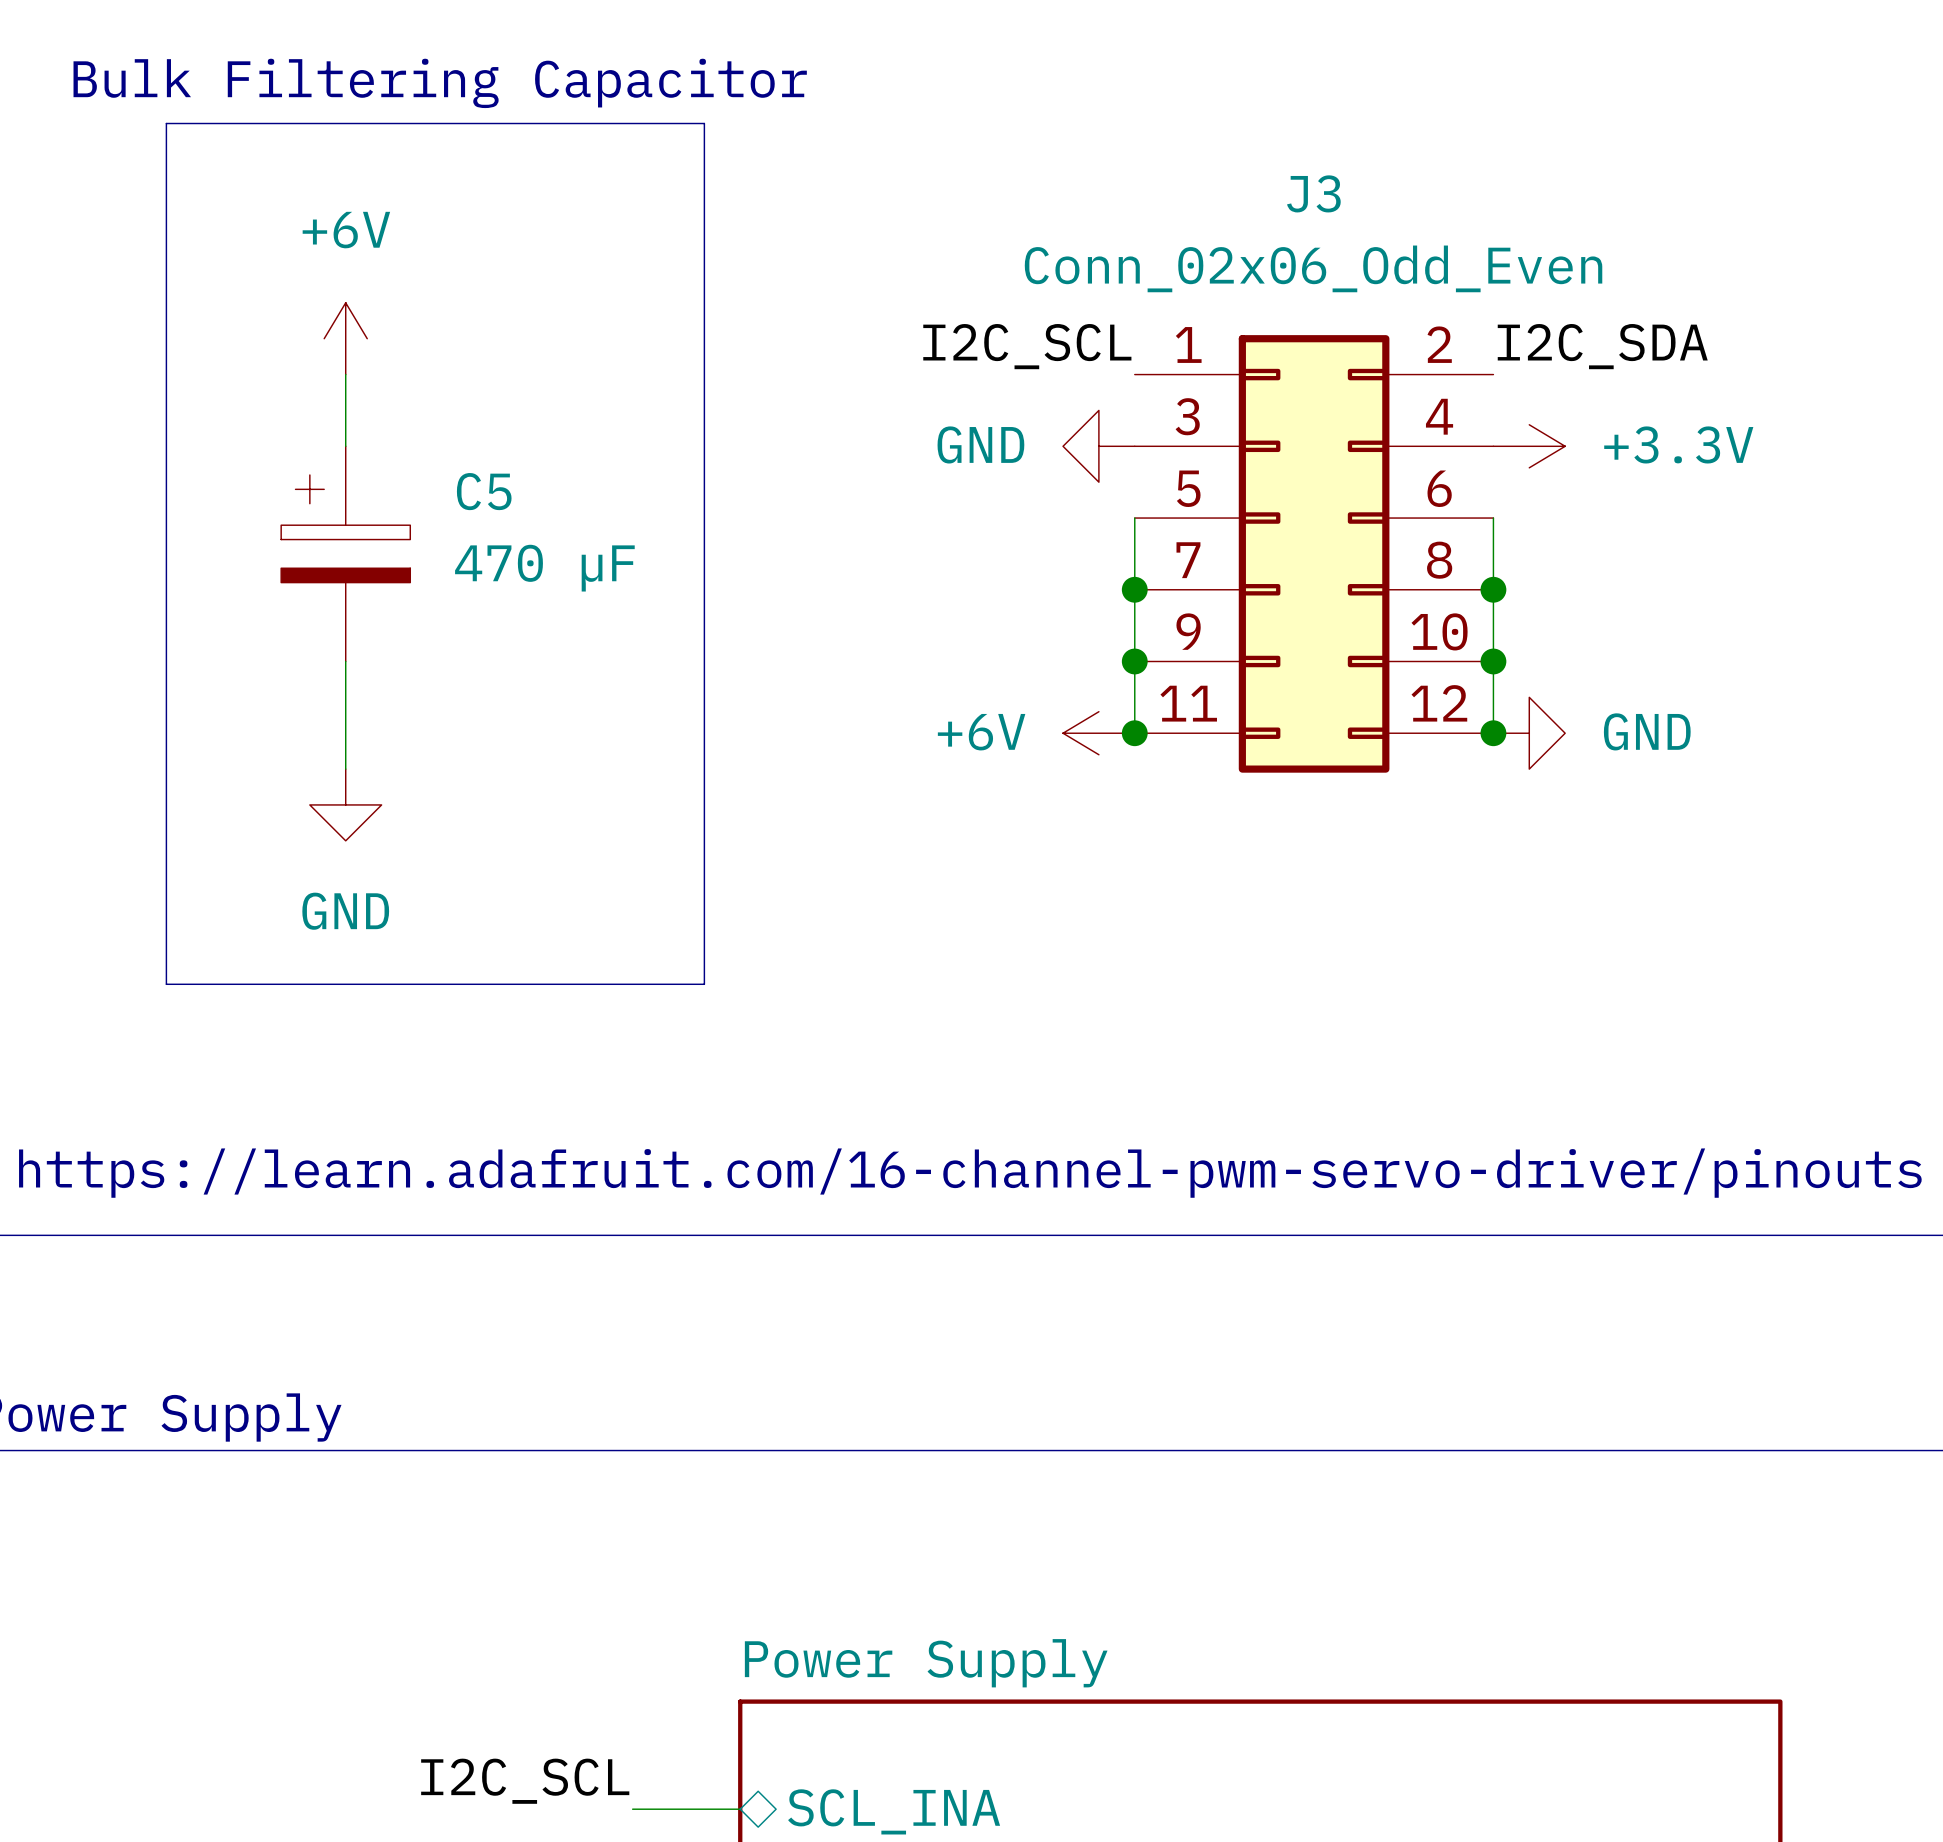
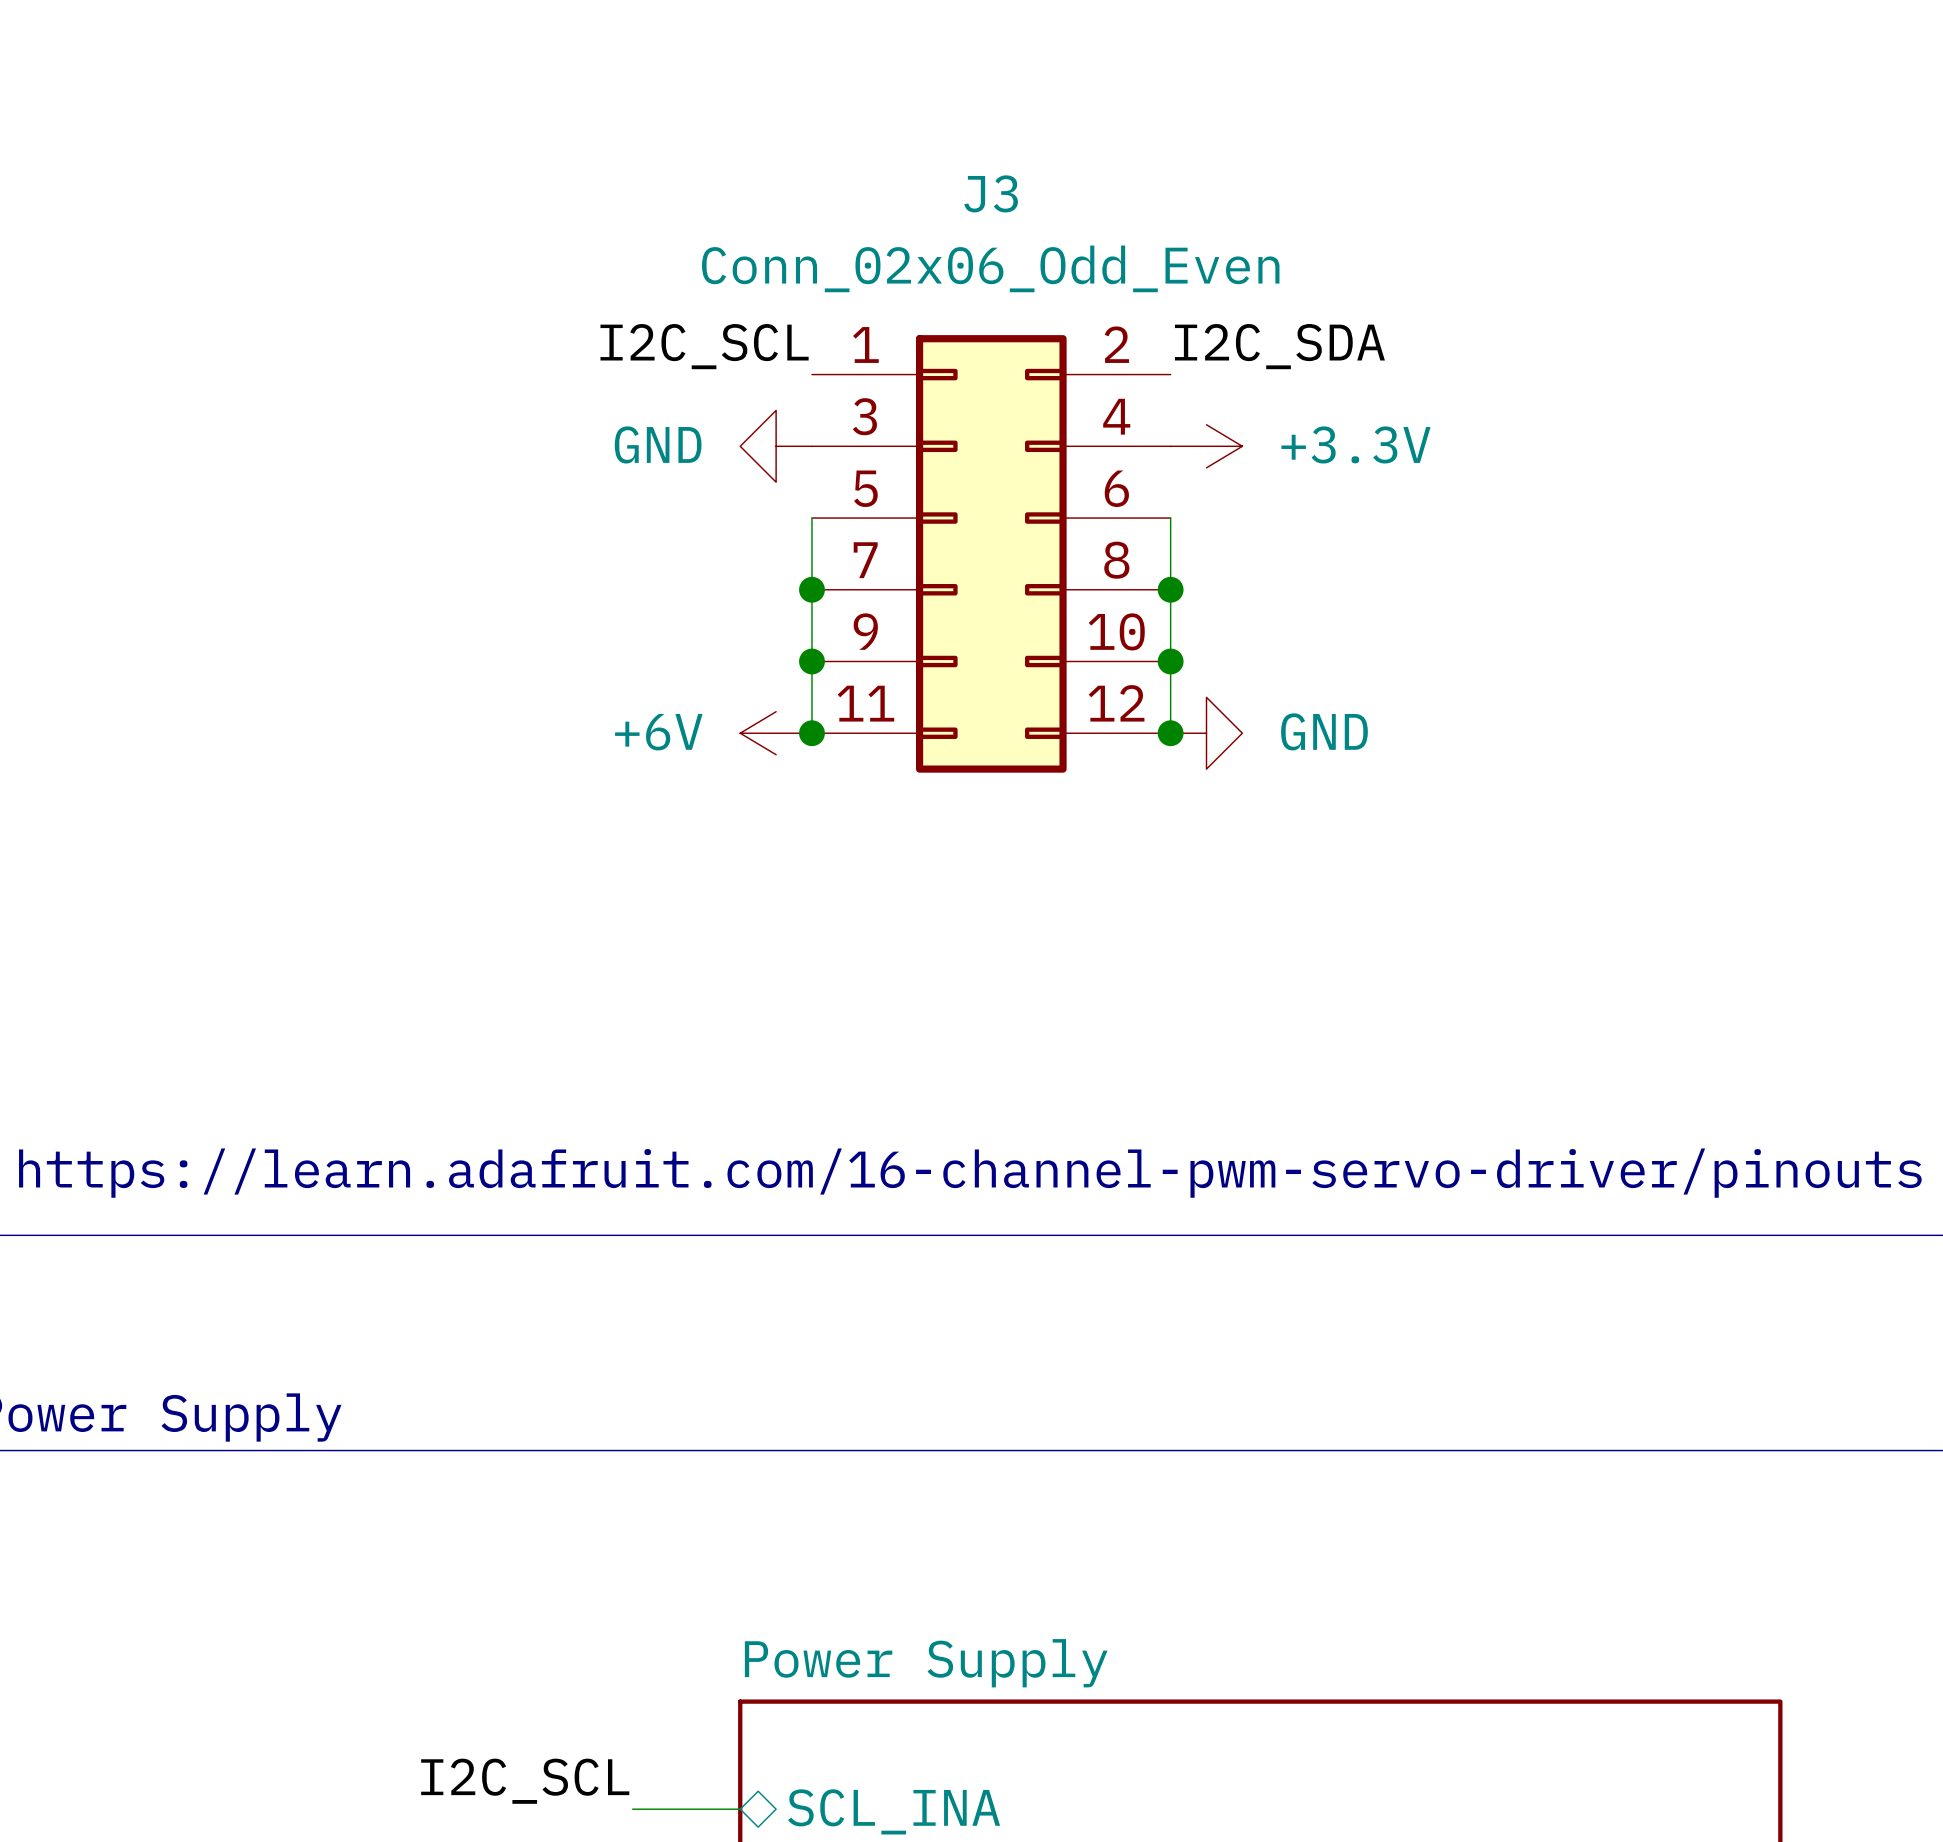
text: Bulk Filtering Capacitor (440, 83) -> none
line: (166, 123) (704, 123) (704, 984) (166, 984) (166, 123) -> none
power symbol: +6V (345, 338) -> none
label position: I2C_SCL (1027, 346) -> I2C_SCL (704, 346)
label position: I2C_SDA (1602, 346) -> I2C_SDA (1279, 346)
wire: (345, 374) (345, 446) -> none
power symbol: none -> GND (776, 446)
power symbol: GND (1098, 446) -> none
power symbol position: +3.3V (1529, 446) -> +3.3V (1206, 446)
wire: (1134, 518) (1134, 733) -> (811, 518) (811, 733)
wire: (1493, 518) (1493, 733) -> (1170, 518) (1170, 733)
C5: 470 µF (345, 553) -> none
J3 position: (1314, 553) -> (991, 553)
junction: none -> (811, 589)
junction position: (1134, 589) -> (1170, 589)
junction: (1493, 589) -> none
wire: (345, 661) (345, 769) -> none
junction: none -> (811, 661)
junction position: (1134, 661) -> (1170, 661)
junction: (1493, 661) -> none
power symbol: none -> +6V (776, 733)
junction: none -> (811, 733)
power symbol: +6V (1098, 733) -> none
junction position: (1134, 733) -> (1170, 733)
power symbol: none -> GND (1206, 733)
junction: (1493, 733) -> none
power symbol: GND (1529, 733) -> none
power symbol: GND (345, 804) -> none

